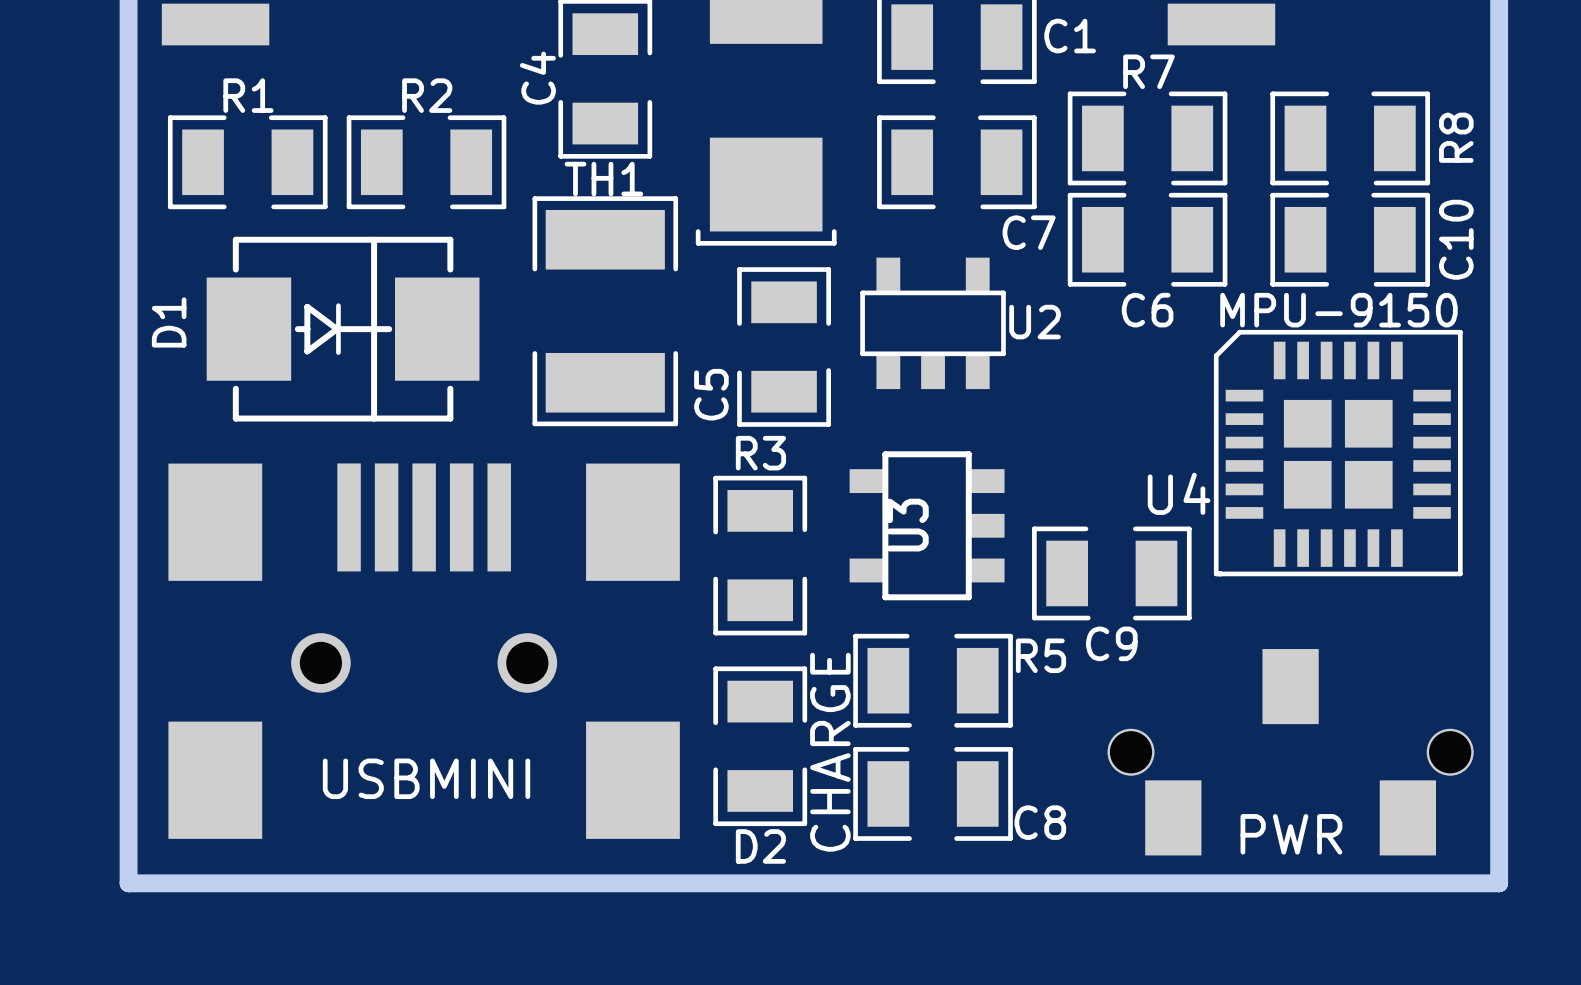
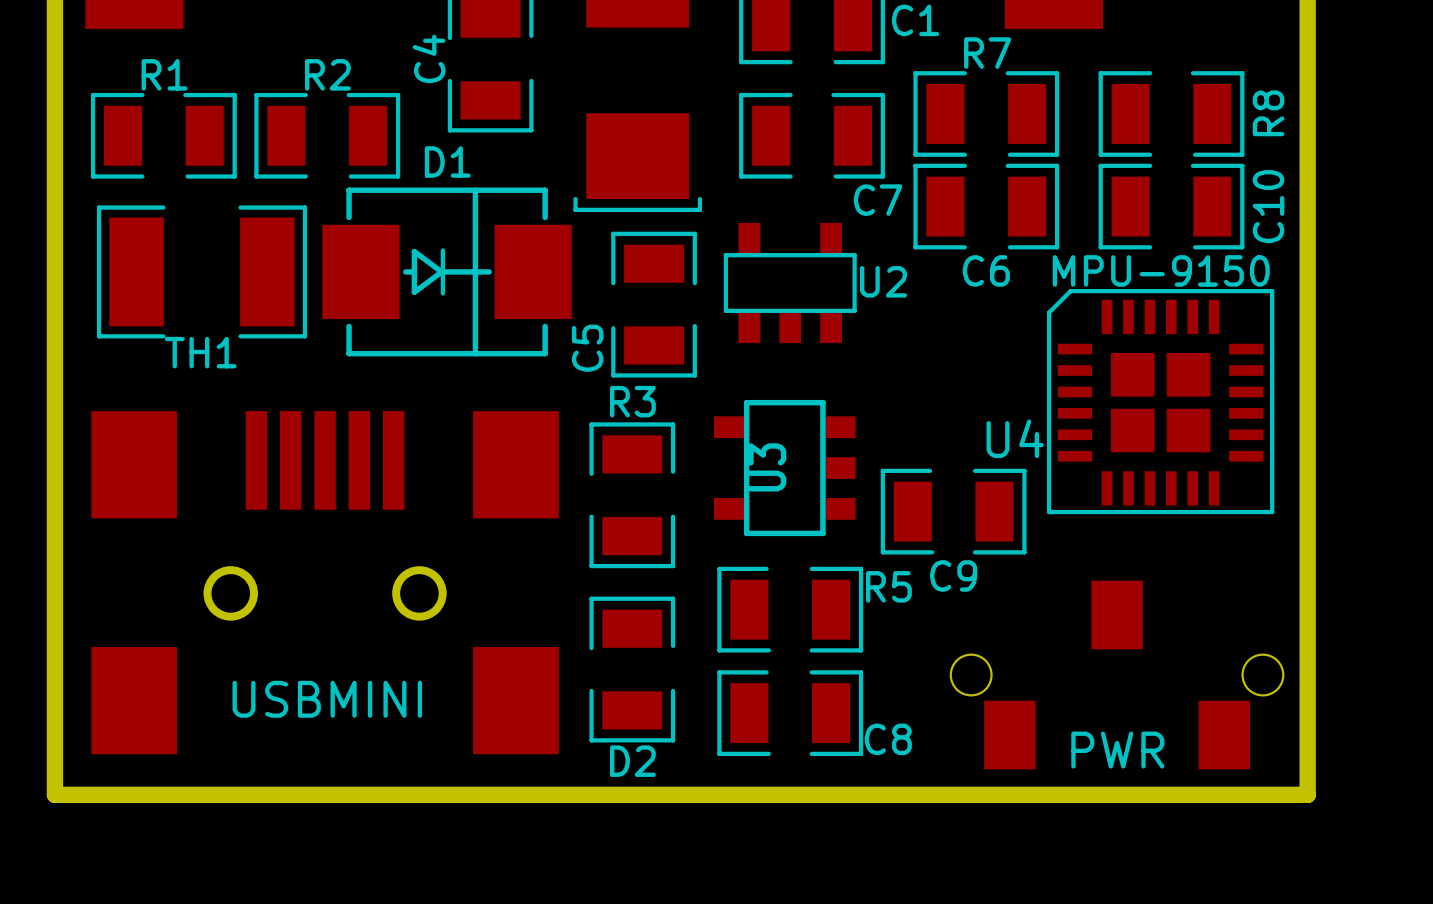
TH1 name position: TH1 (603, 179) -> TH1 (200, 352)
TH1 rotation: 0° (605, 311) -> 90° clockwise (201, 271)
TH1 position: (605, 311) -> (201, 271)
D1 name rotation: 0° (169, 322) -> 90° clockwise (447, 161)
D1 name position: D1 (169, 322) -> D1 (447, 161)
D1 position: (343, 329) -> (447, 271)
text: CHARGE (830, 752) -> none

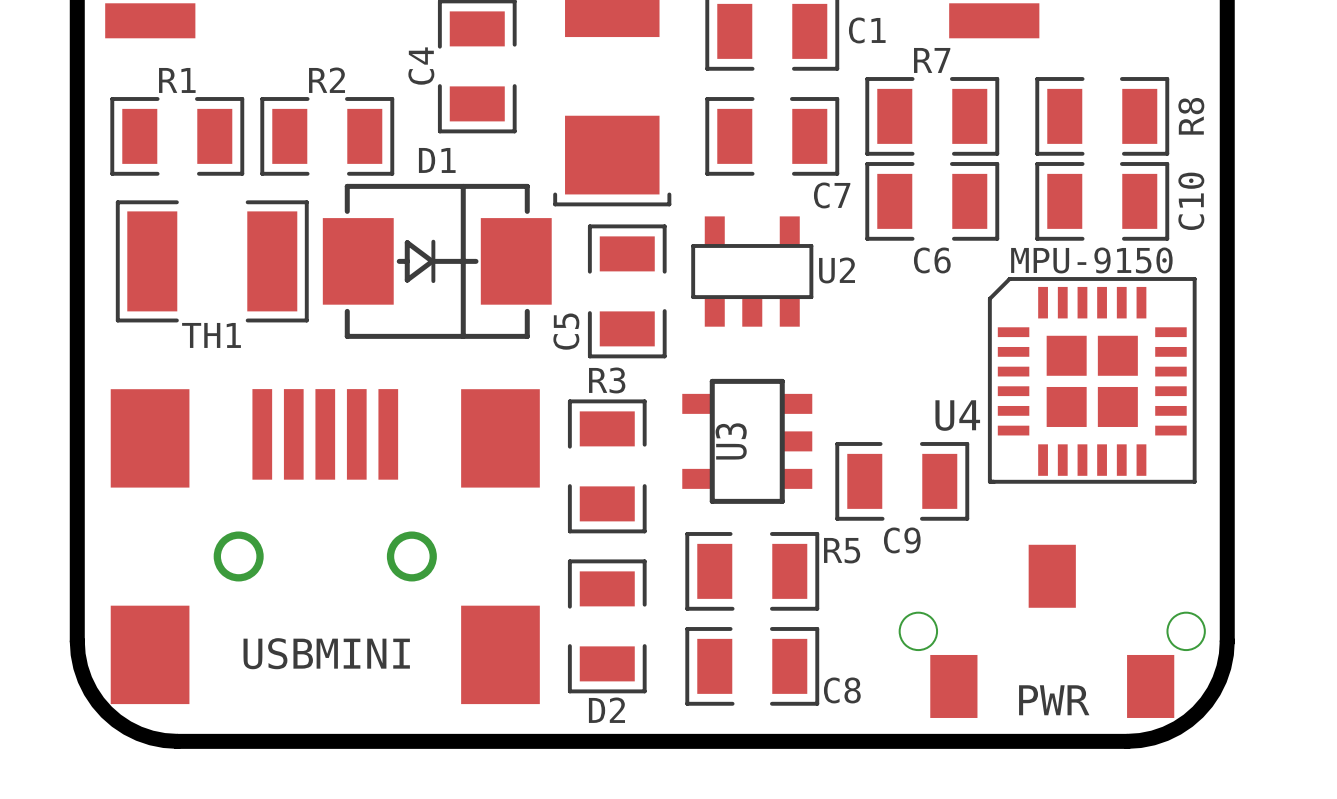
board edge: (54, 685) (54, 794) (163, 794) -> (77, 641) (80, 667) (84, 679) (97, 702) (106, 712) (116, 720) (139, 733) (151, 737) (177, 741)
board edge: (1307, 685) (1307, 794) (1198, 794) -> (1227, 641) (1223, 667) (1219, 679) (1206, 702) (1197, 712) (1188, 720) (1165, 733) (1153, 737) (1127, 741)

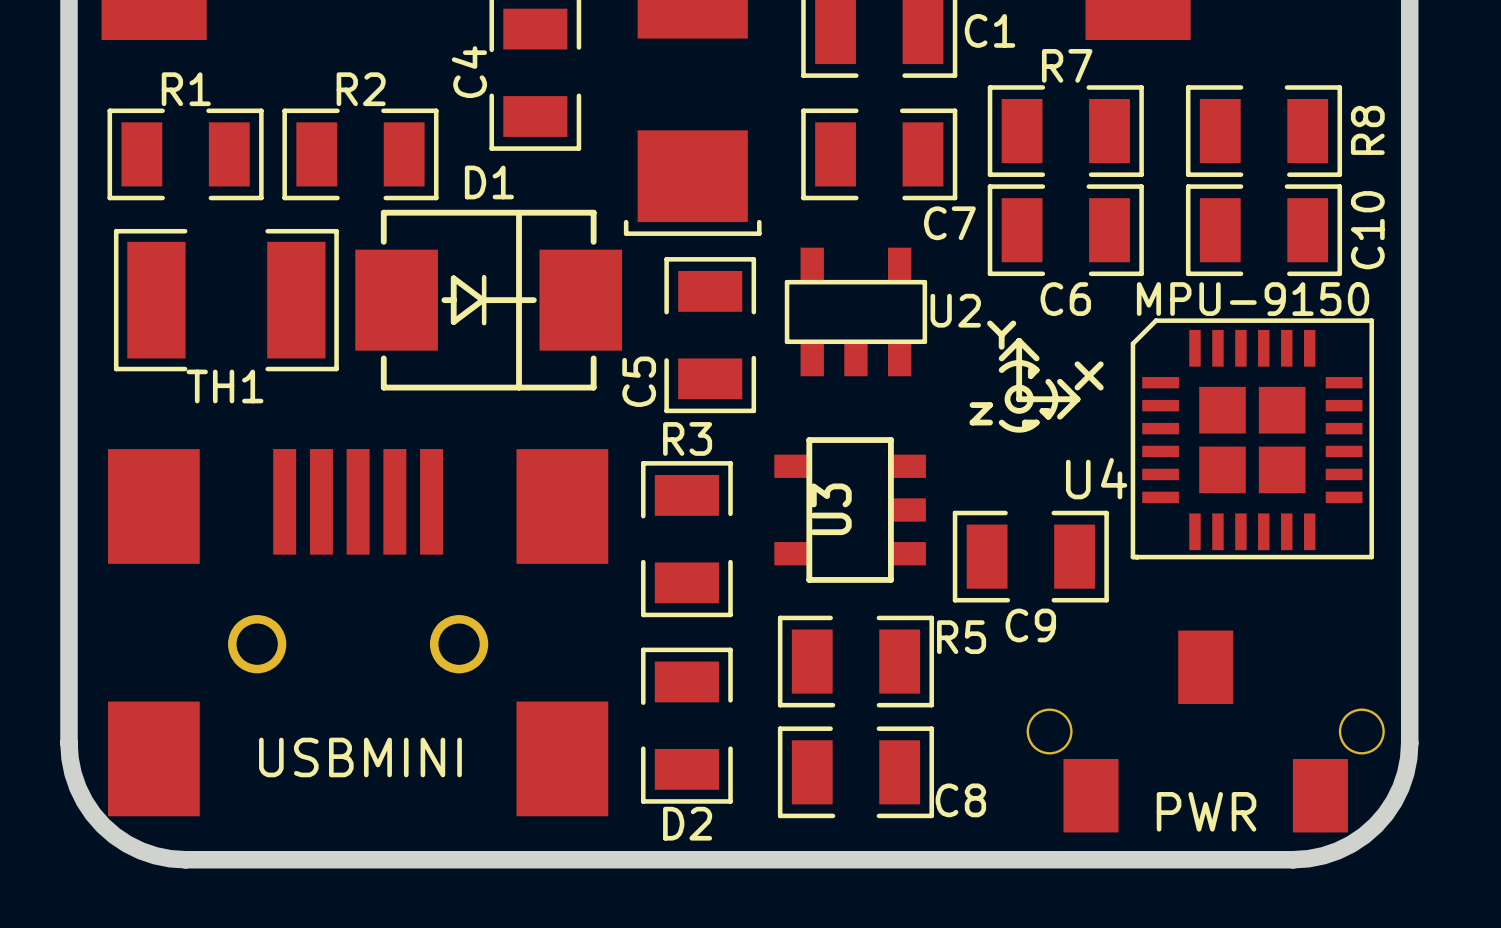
line: none -> (990, 323) (1001, 335)
line: none -> (1013, 323) (1001, 335)
line: none -> (1001, 335) (1001, 346)
line: none -> (1019, 340) (1036, 358)
line: none -> (1019, 340) (1001, 358)
line: none -> (1019, 340) (1019, 399) (1077, 399)
line: none -> (1077, 364) (1100, 387)
line: none -> (1100, 364) (1077, 387)
line: none -> (1001, 370) (1009, 364) (1019, 362) (1028, 364) (1036, 370) (1030, 375) (1030, 370)
line: none -> (1048, 381) (1053, 389) (1055, 399) (1053, 408) (1048, 416) (1042, 410) (1048, 410)
line: none -> (1059, 381) (1077, 399)
drawing: none -> [1004, 384, 1034, 414]
line: none -> (1077, 399) (1059, 416)
line: none -> (972, 405) (990, 405) (972, 422) (990, 422)
line: none -> (1001, 422) (1009, 427) (1019, 429) (1028, 427) (1036, 422) (1024, 422) (1024, 428)

